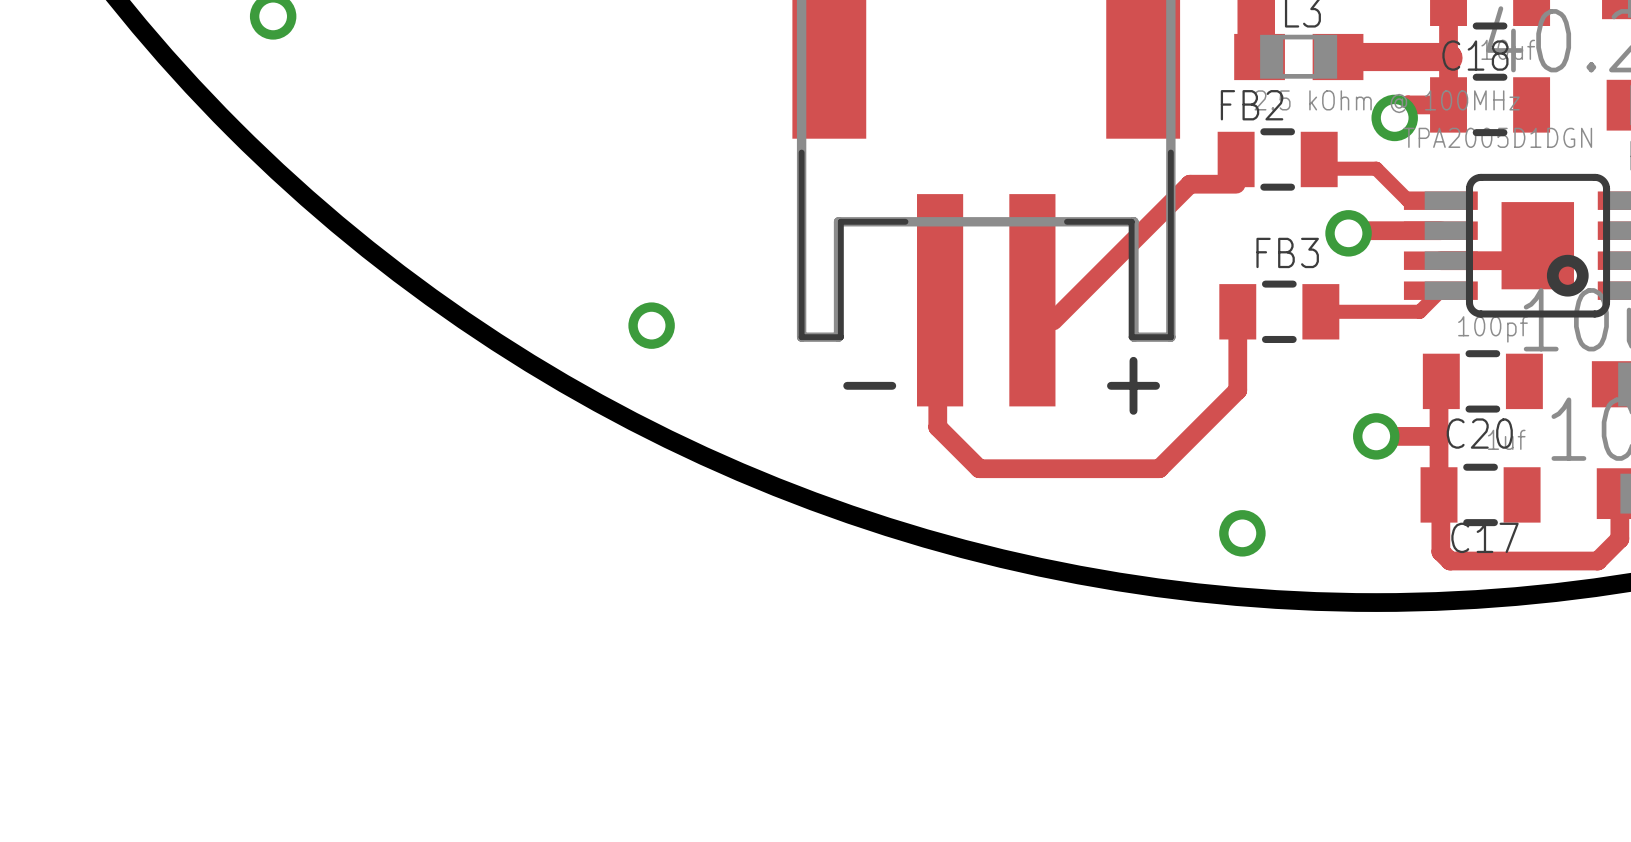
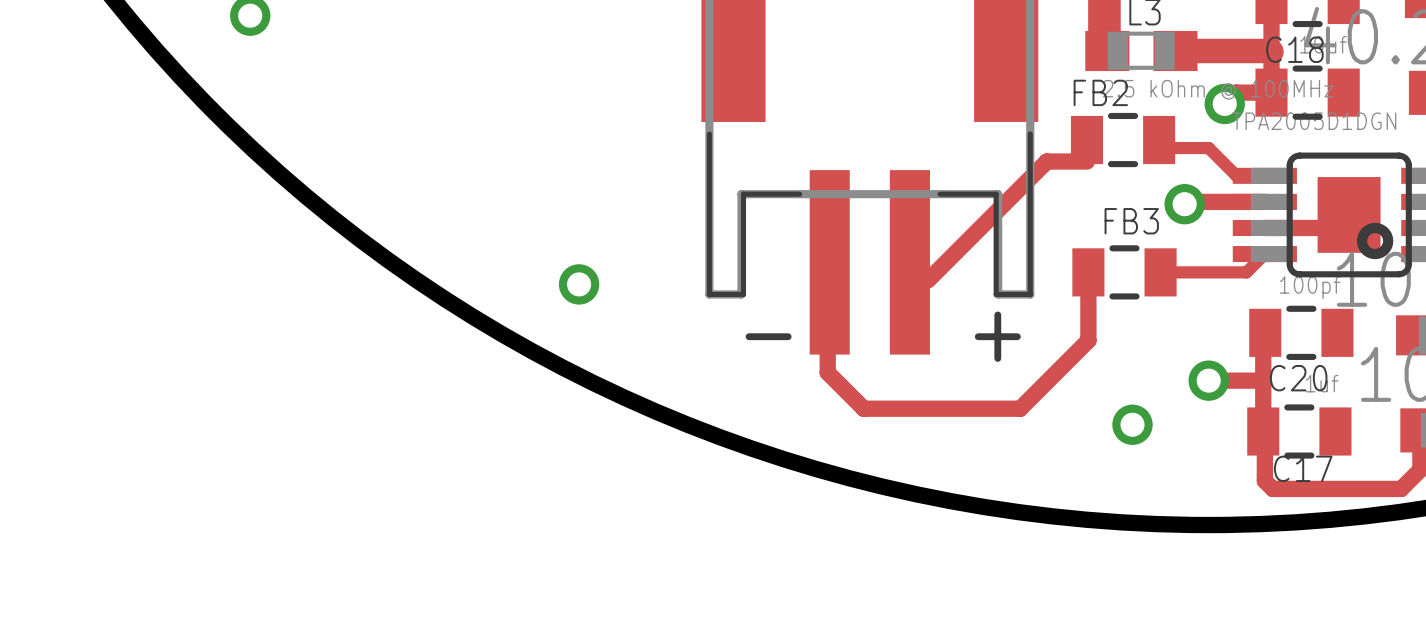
via position: (1242, 533) -> (1132, 424)

